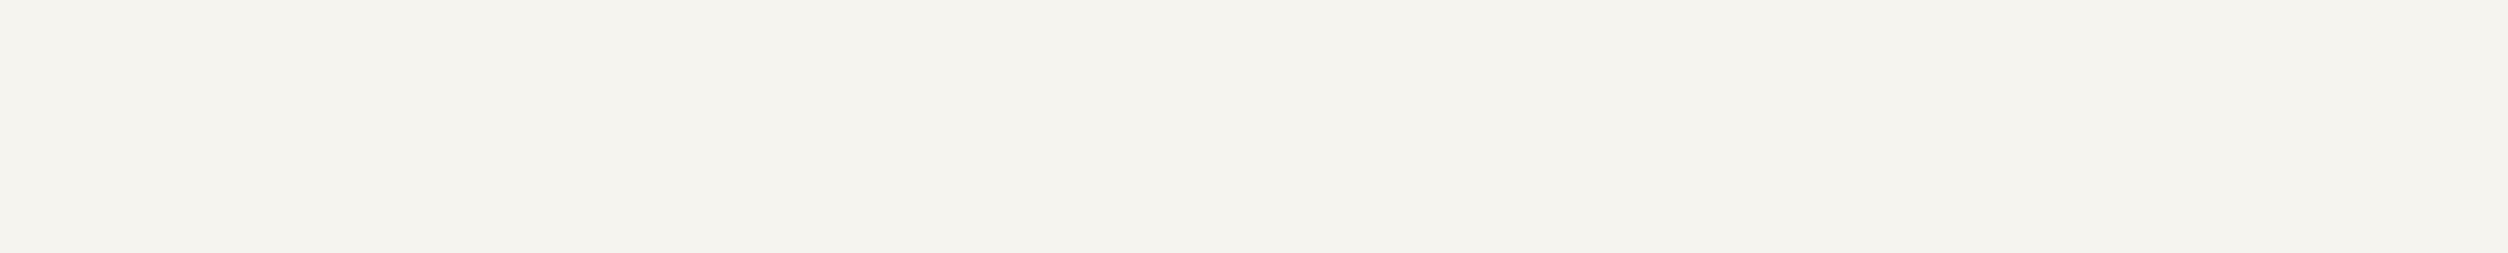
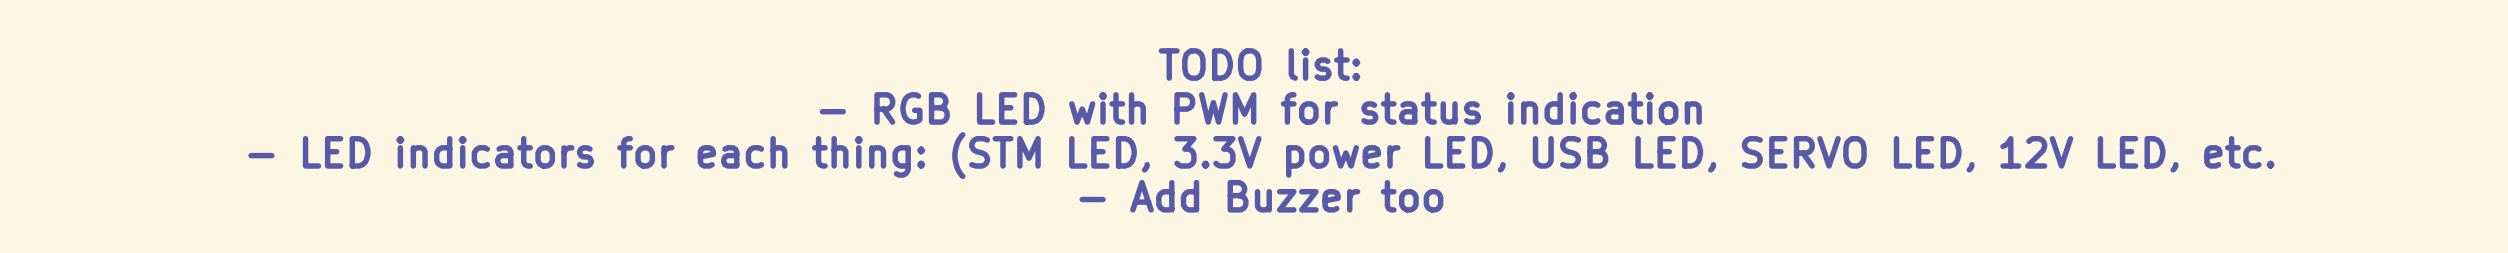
text: none -> TODO list: (1259, 64)
text: none -> - RGB LED with PWM for status indication (1260, 108)
text: none -> - LED indicators for each thing: (STM LED, 3.3V power LED, USB LED, SERVO LED, 12V LED, etc. (1261, 155)
text: none -> - Add Buzzer too (1261, 196)

